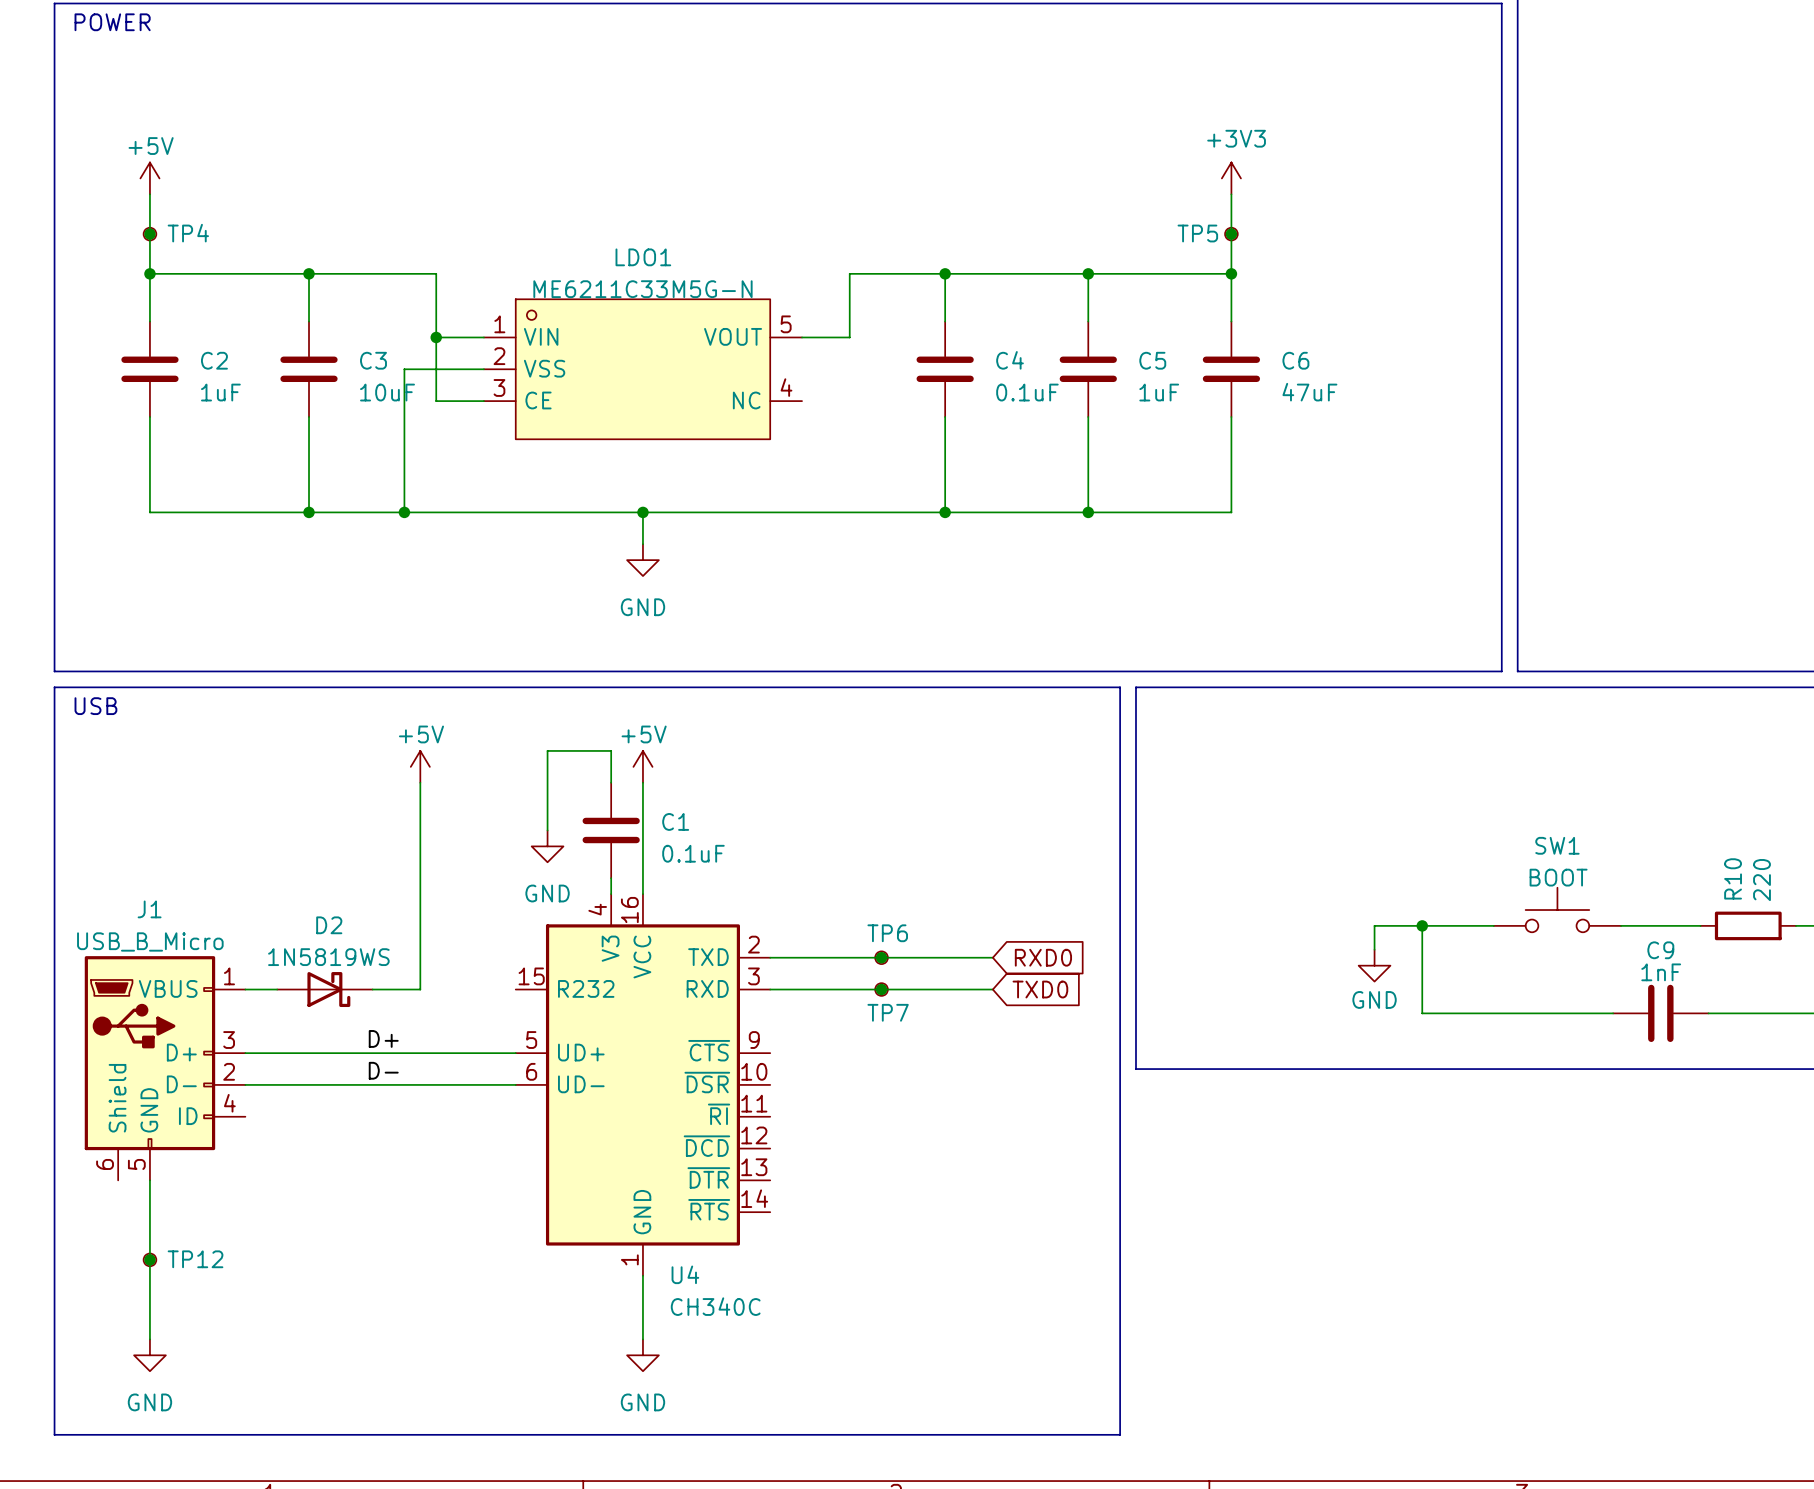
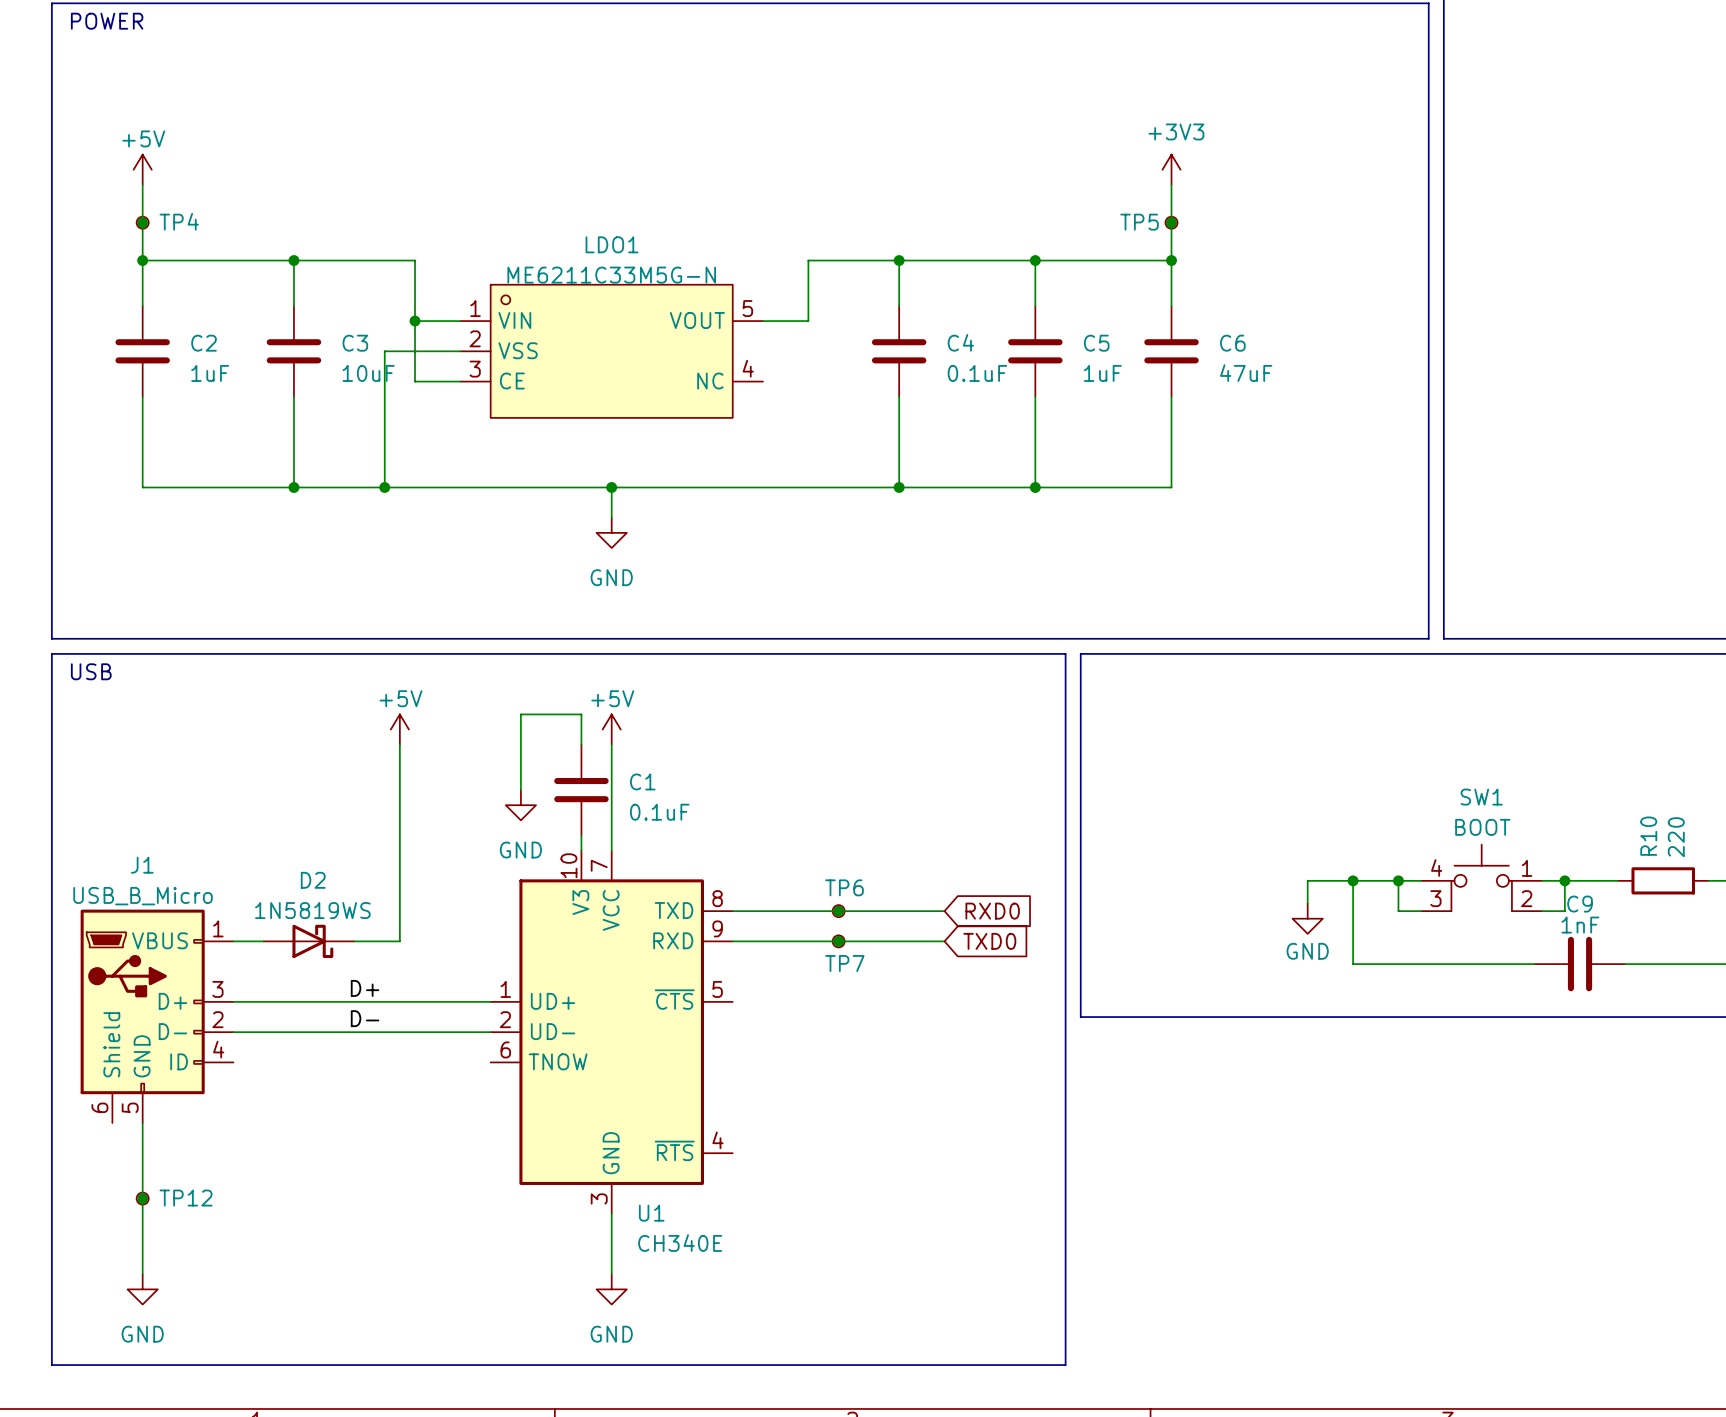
SW1 symbol: [1493, 887, 1622, 933] -> [1421, 844, 1543, 912]
wire: none -> (1398, 880) (1398, 911) (1421, 911)
junction: none -> (1398, 880)
wire: none -> (1564, 880) (1564, 911) (1542, 911)
junction: none -> (1564, 880)
U4: CH340C (642, 1084) -> none
U1: none -> CH340E (611, 1032)

